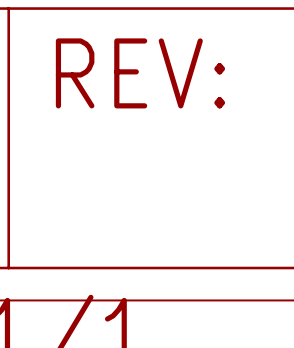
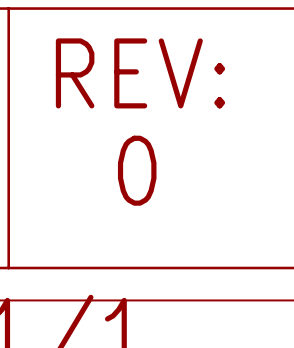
text: none -> 0 (137, 170)

